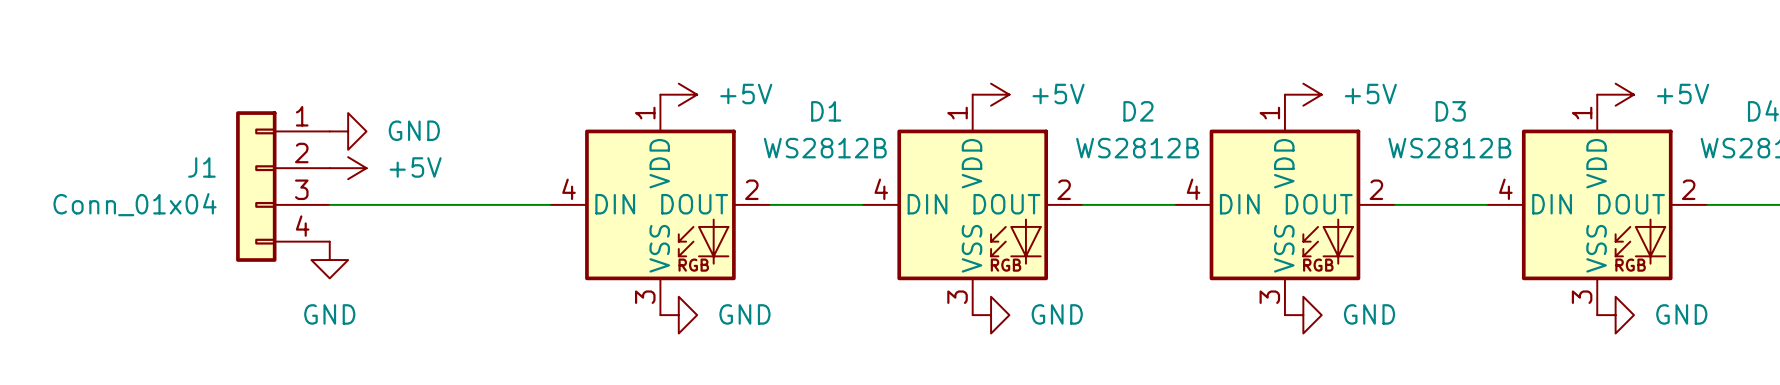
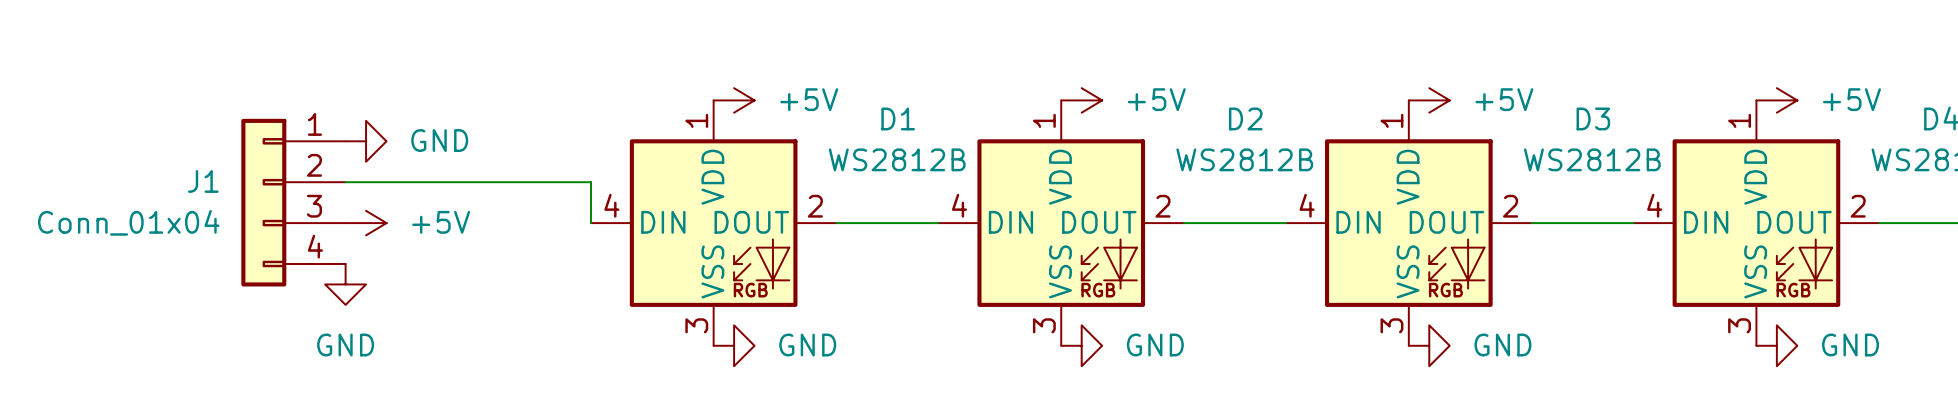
power symbol position: +5V (348, 168) -> +5V (366, 223)
wire: (329, 204) (550, 204) -> (345, 182) (590, 182) (590, 223)

